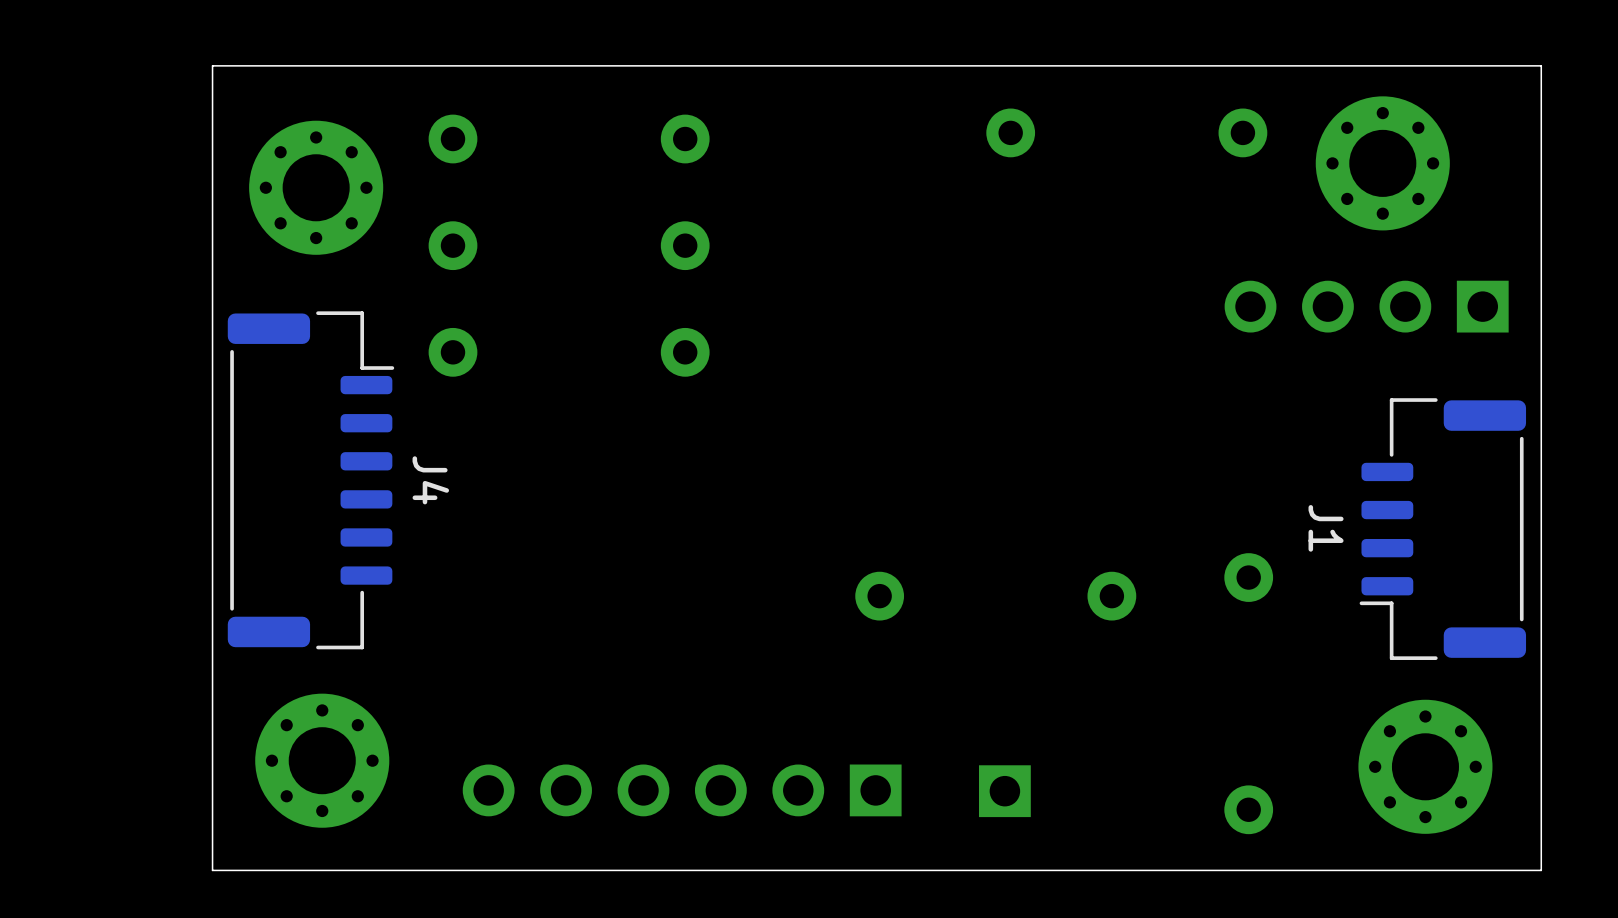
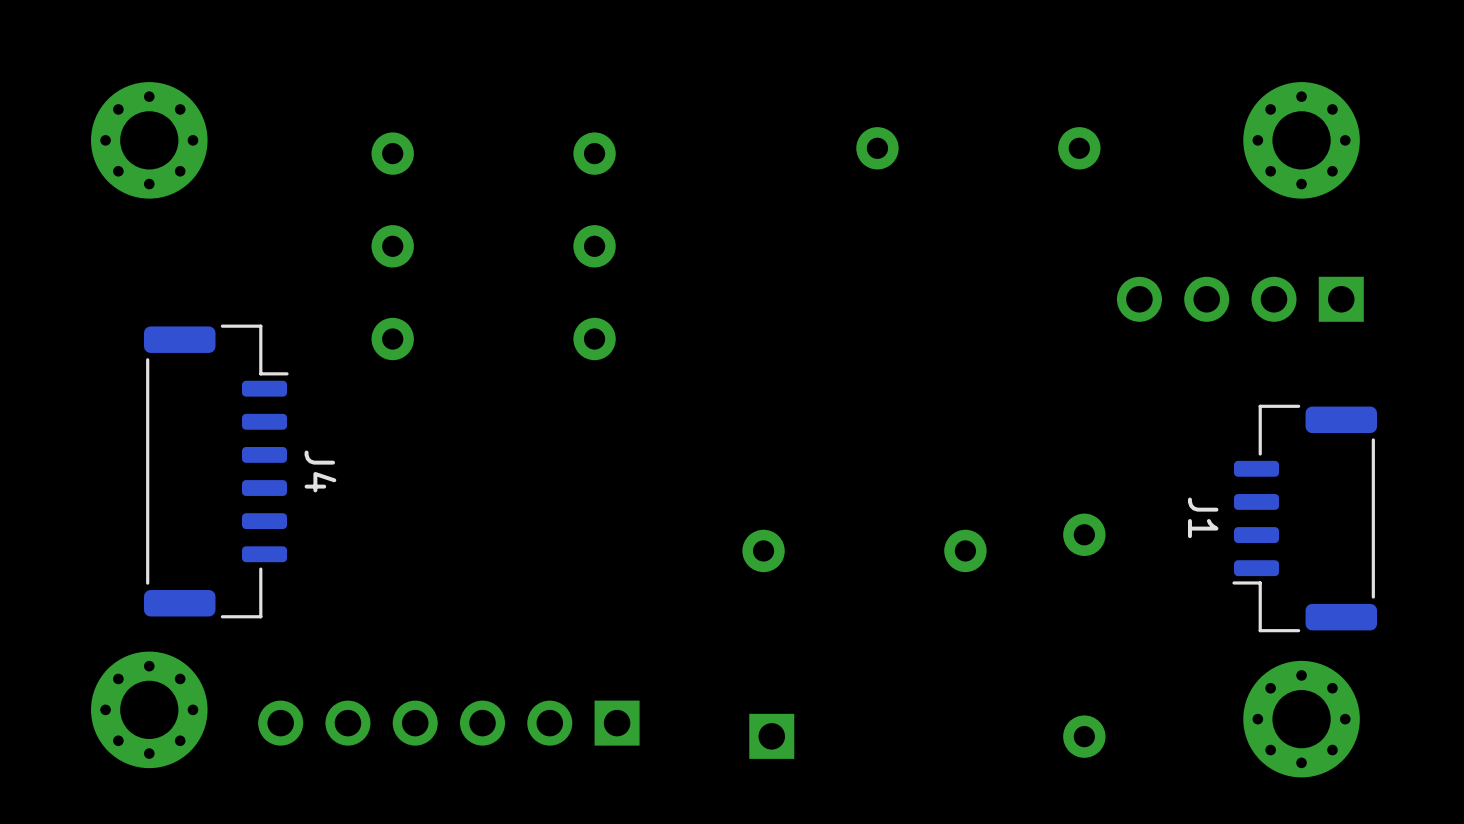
board edge: (1541, 65) (212, 65) (212, 870) (1541, 870) (1541, 65) -> none
part position: (1382, 163) -> (1301, 140)
part position: (316, 187) -> (149, 140)
part position: (1366, 306) -> (1240, 299)
J4 position: (310, 480) -> (216, 471)
J1 position: (1442, 529) -> (1304, 518)
part position: (322, 760) -> (149, 709)
part position: (1425, 766) -> (1301, 719)
part position: (682, 790) -> (448, 723)
part position: (1004, 791) -> (771, 736)

